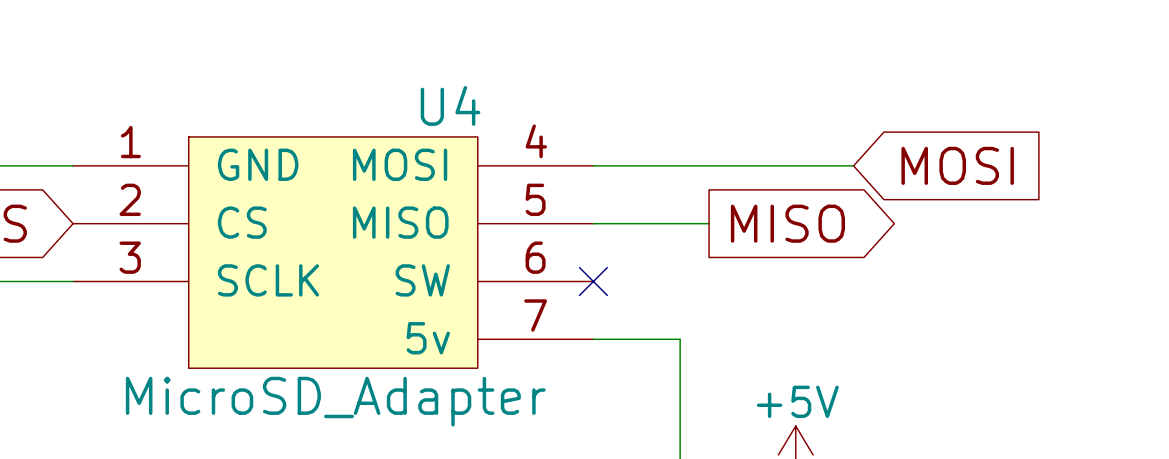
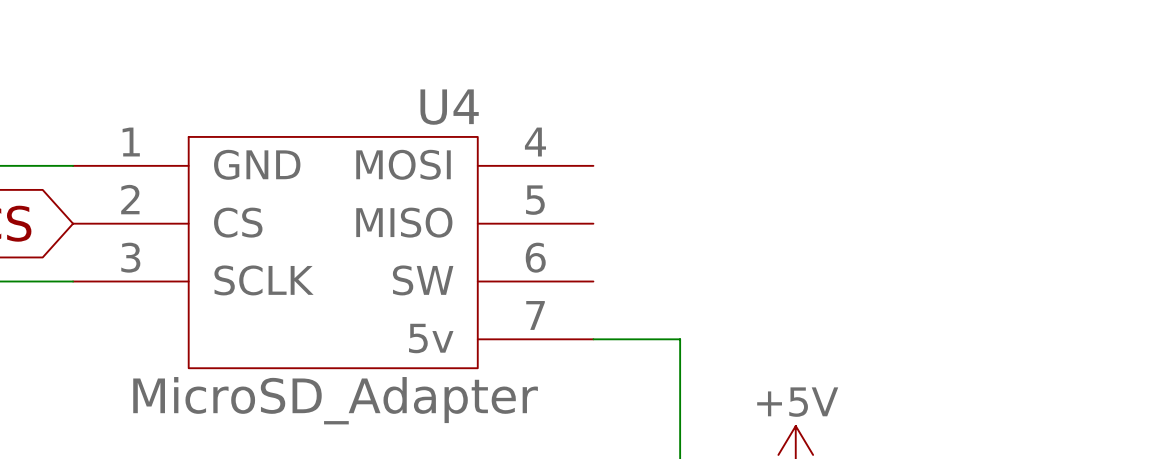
wire: (593, 165) (853, 165) -> none
global label: MOSI (957, 165) -> none
wire: (593, 223) (709, 223) -> none
global label: MISO (787, 223) -> none
no-connect mark: (593, 281) -> none

